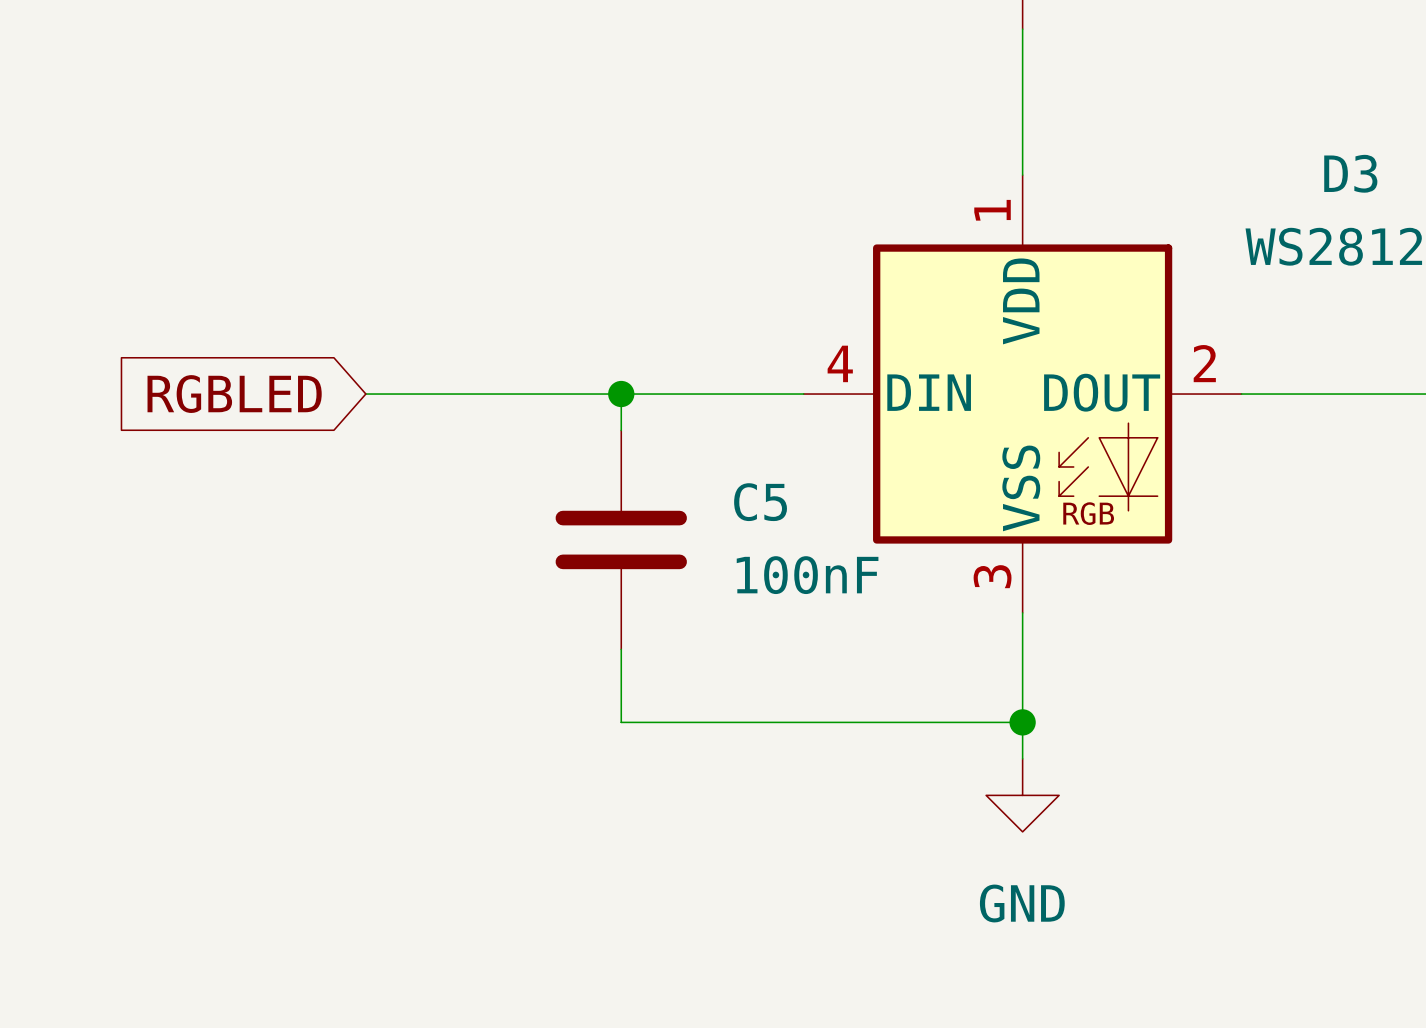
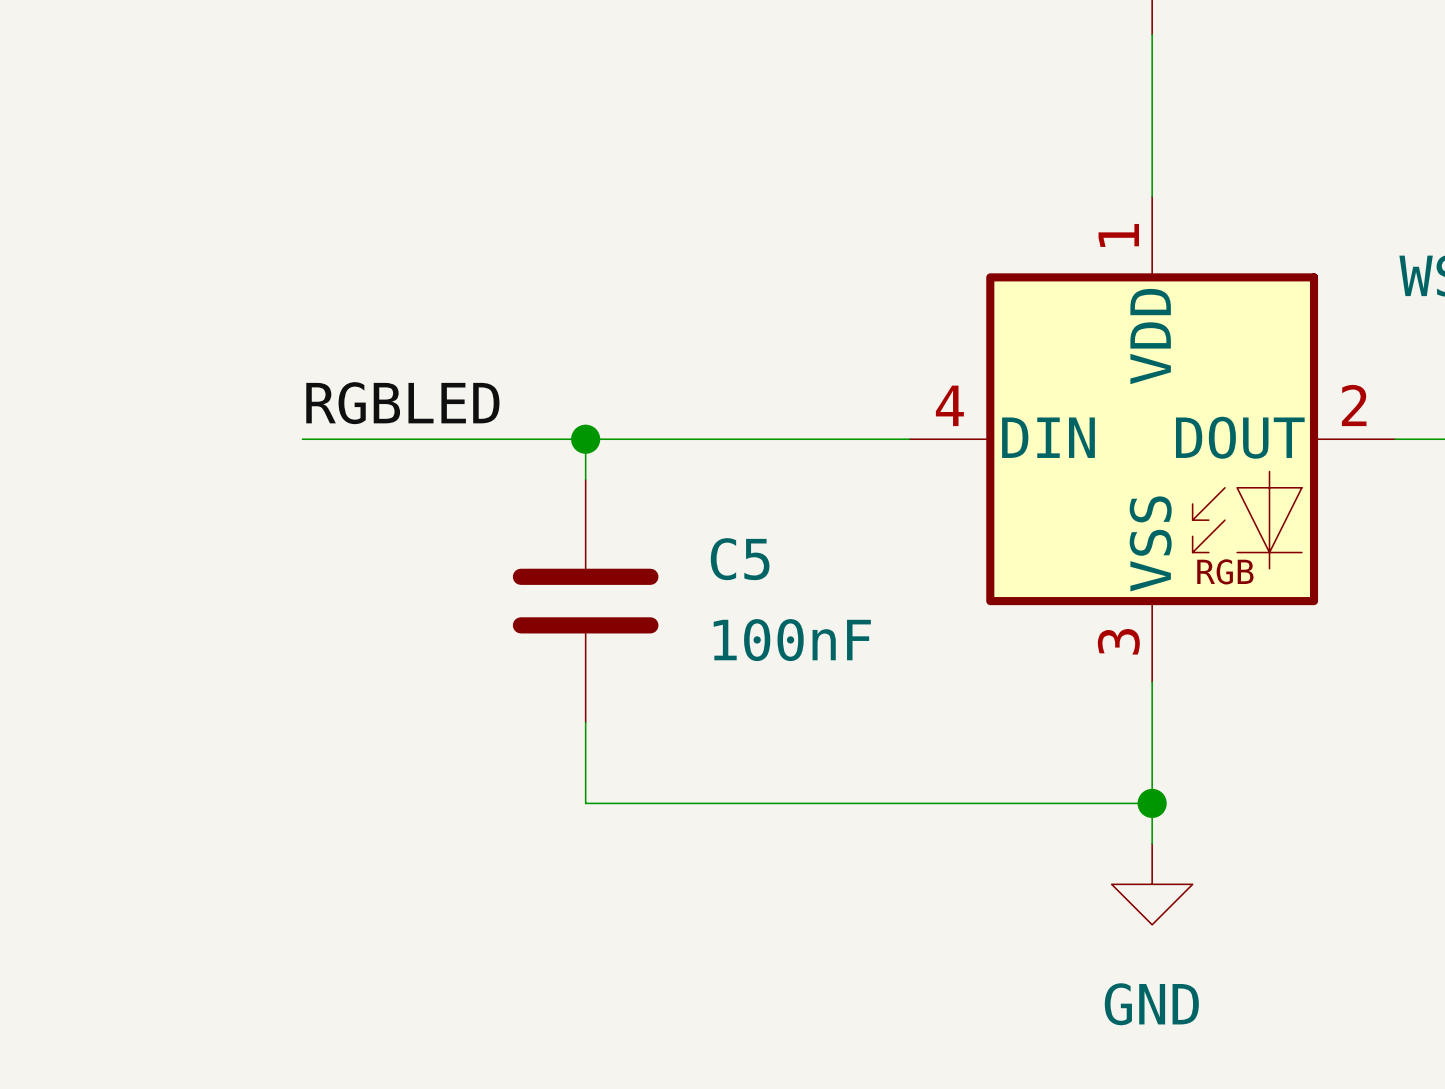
label: none -> RGBLED (402, 403)
global label: RGBLED (234, 394) -> none
wire: none -> (302, 439) (423, 439)
wire: (621, 394) (621, 430) -> (585, 439) (585, 479)
junction position: (621, 394) -> (585, 439)
C5 position: (621, 539) -> (585, 601)
wire: (621, 649) (621, 722) -> (585, 722) (585, 803) (707, 803)

